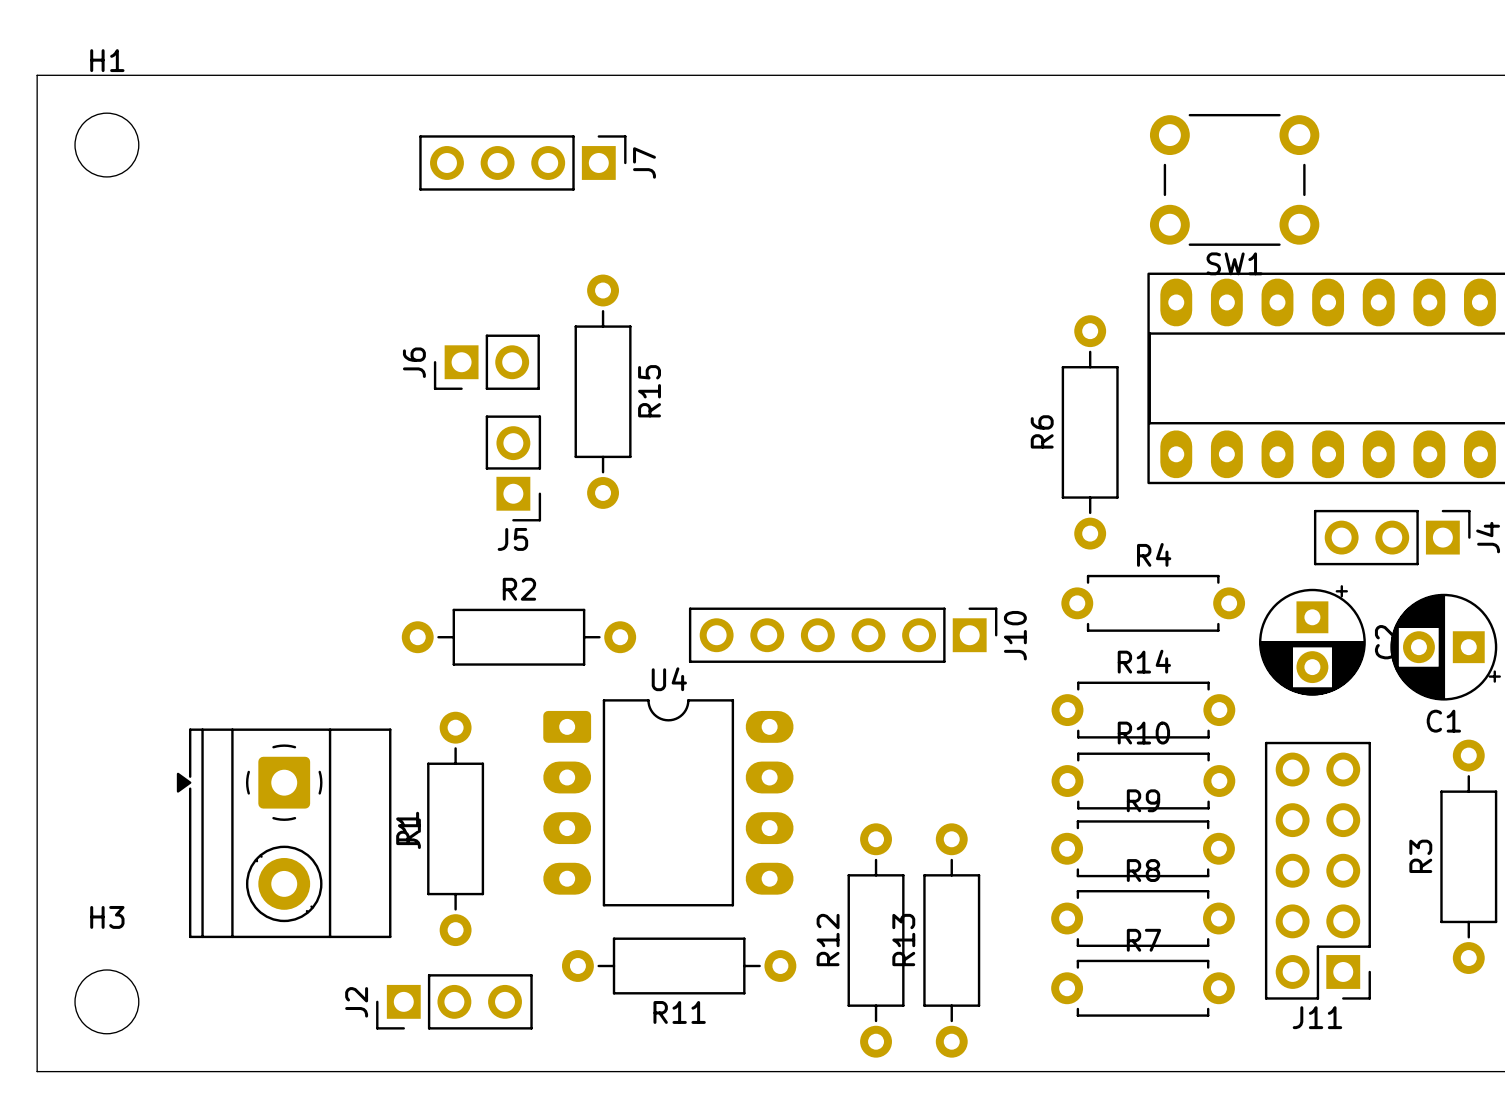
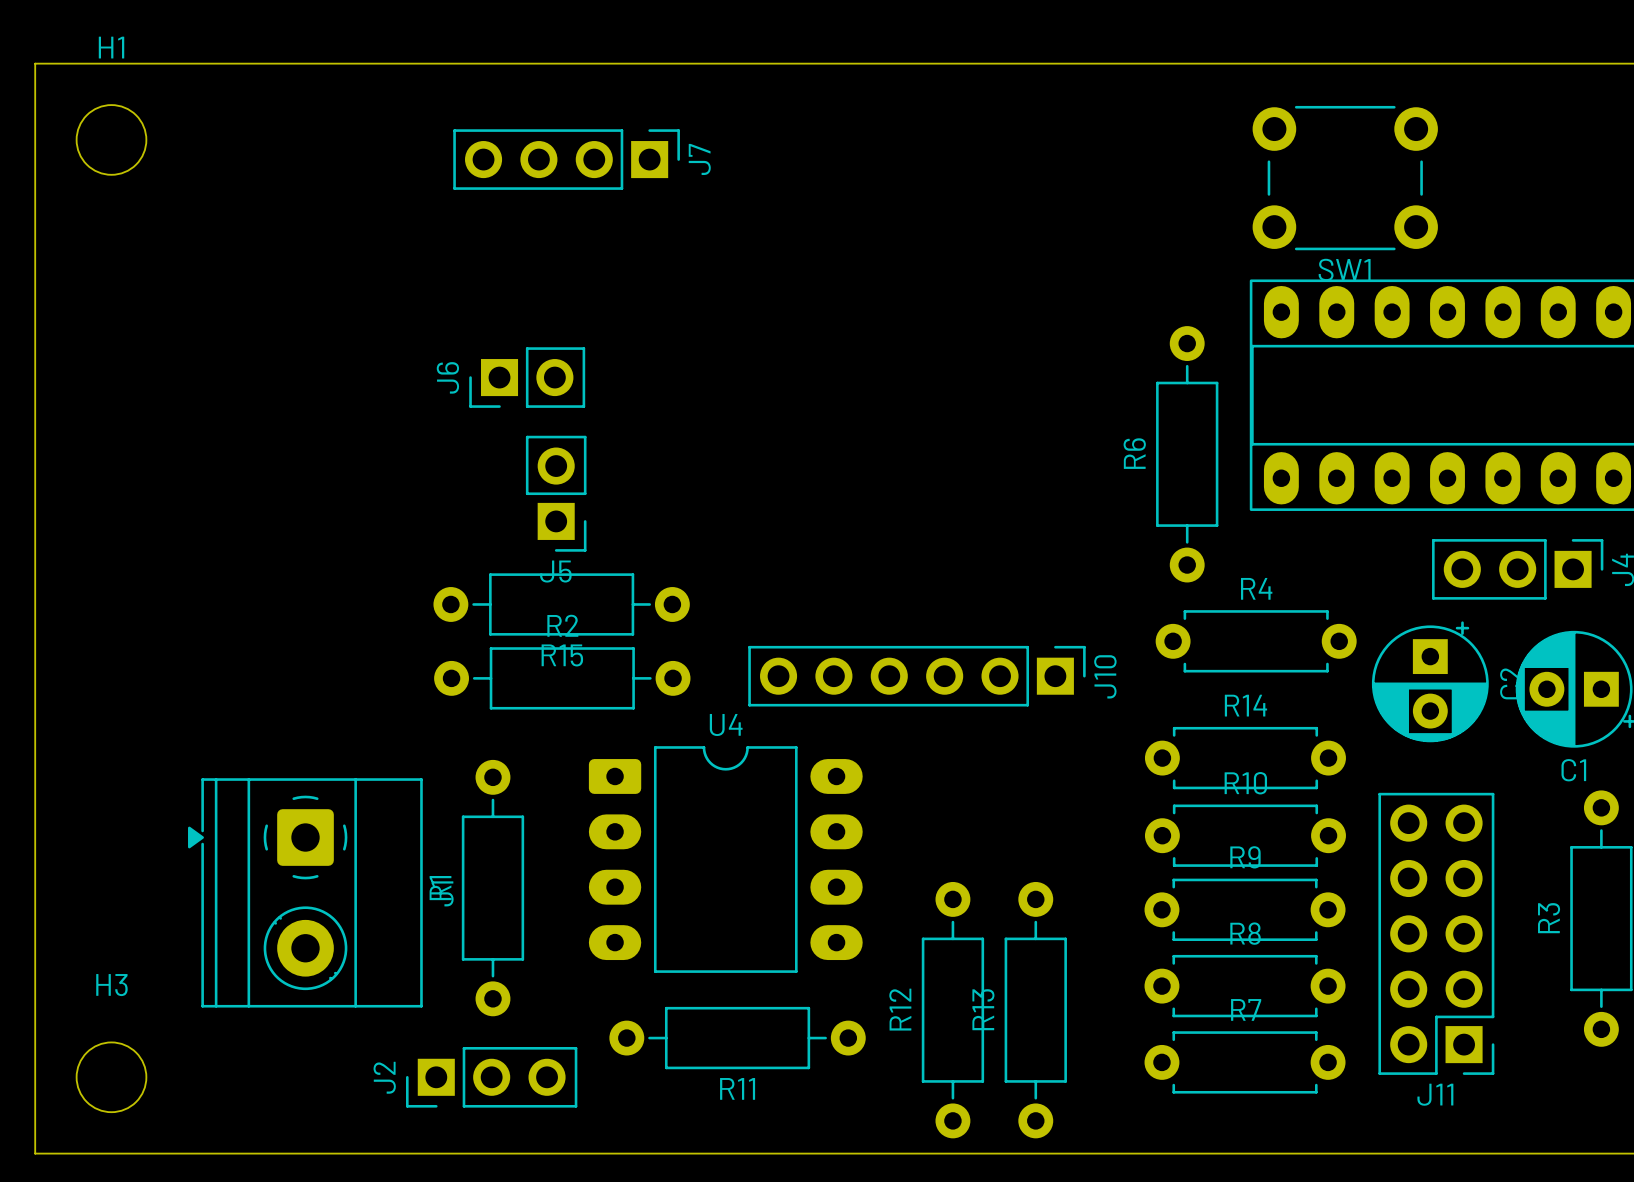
R15 rotation: 0° (603, 391) -> 90° clockwise (561, 604)
R15 position: (603, 391) -> (561, 604)

